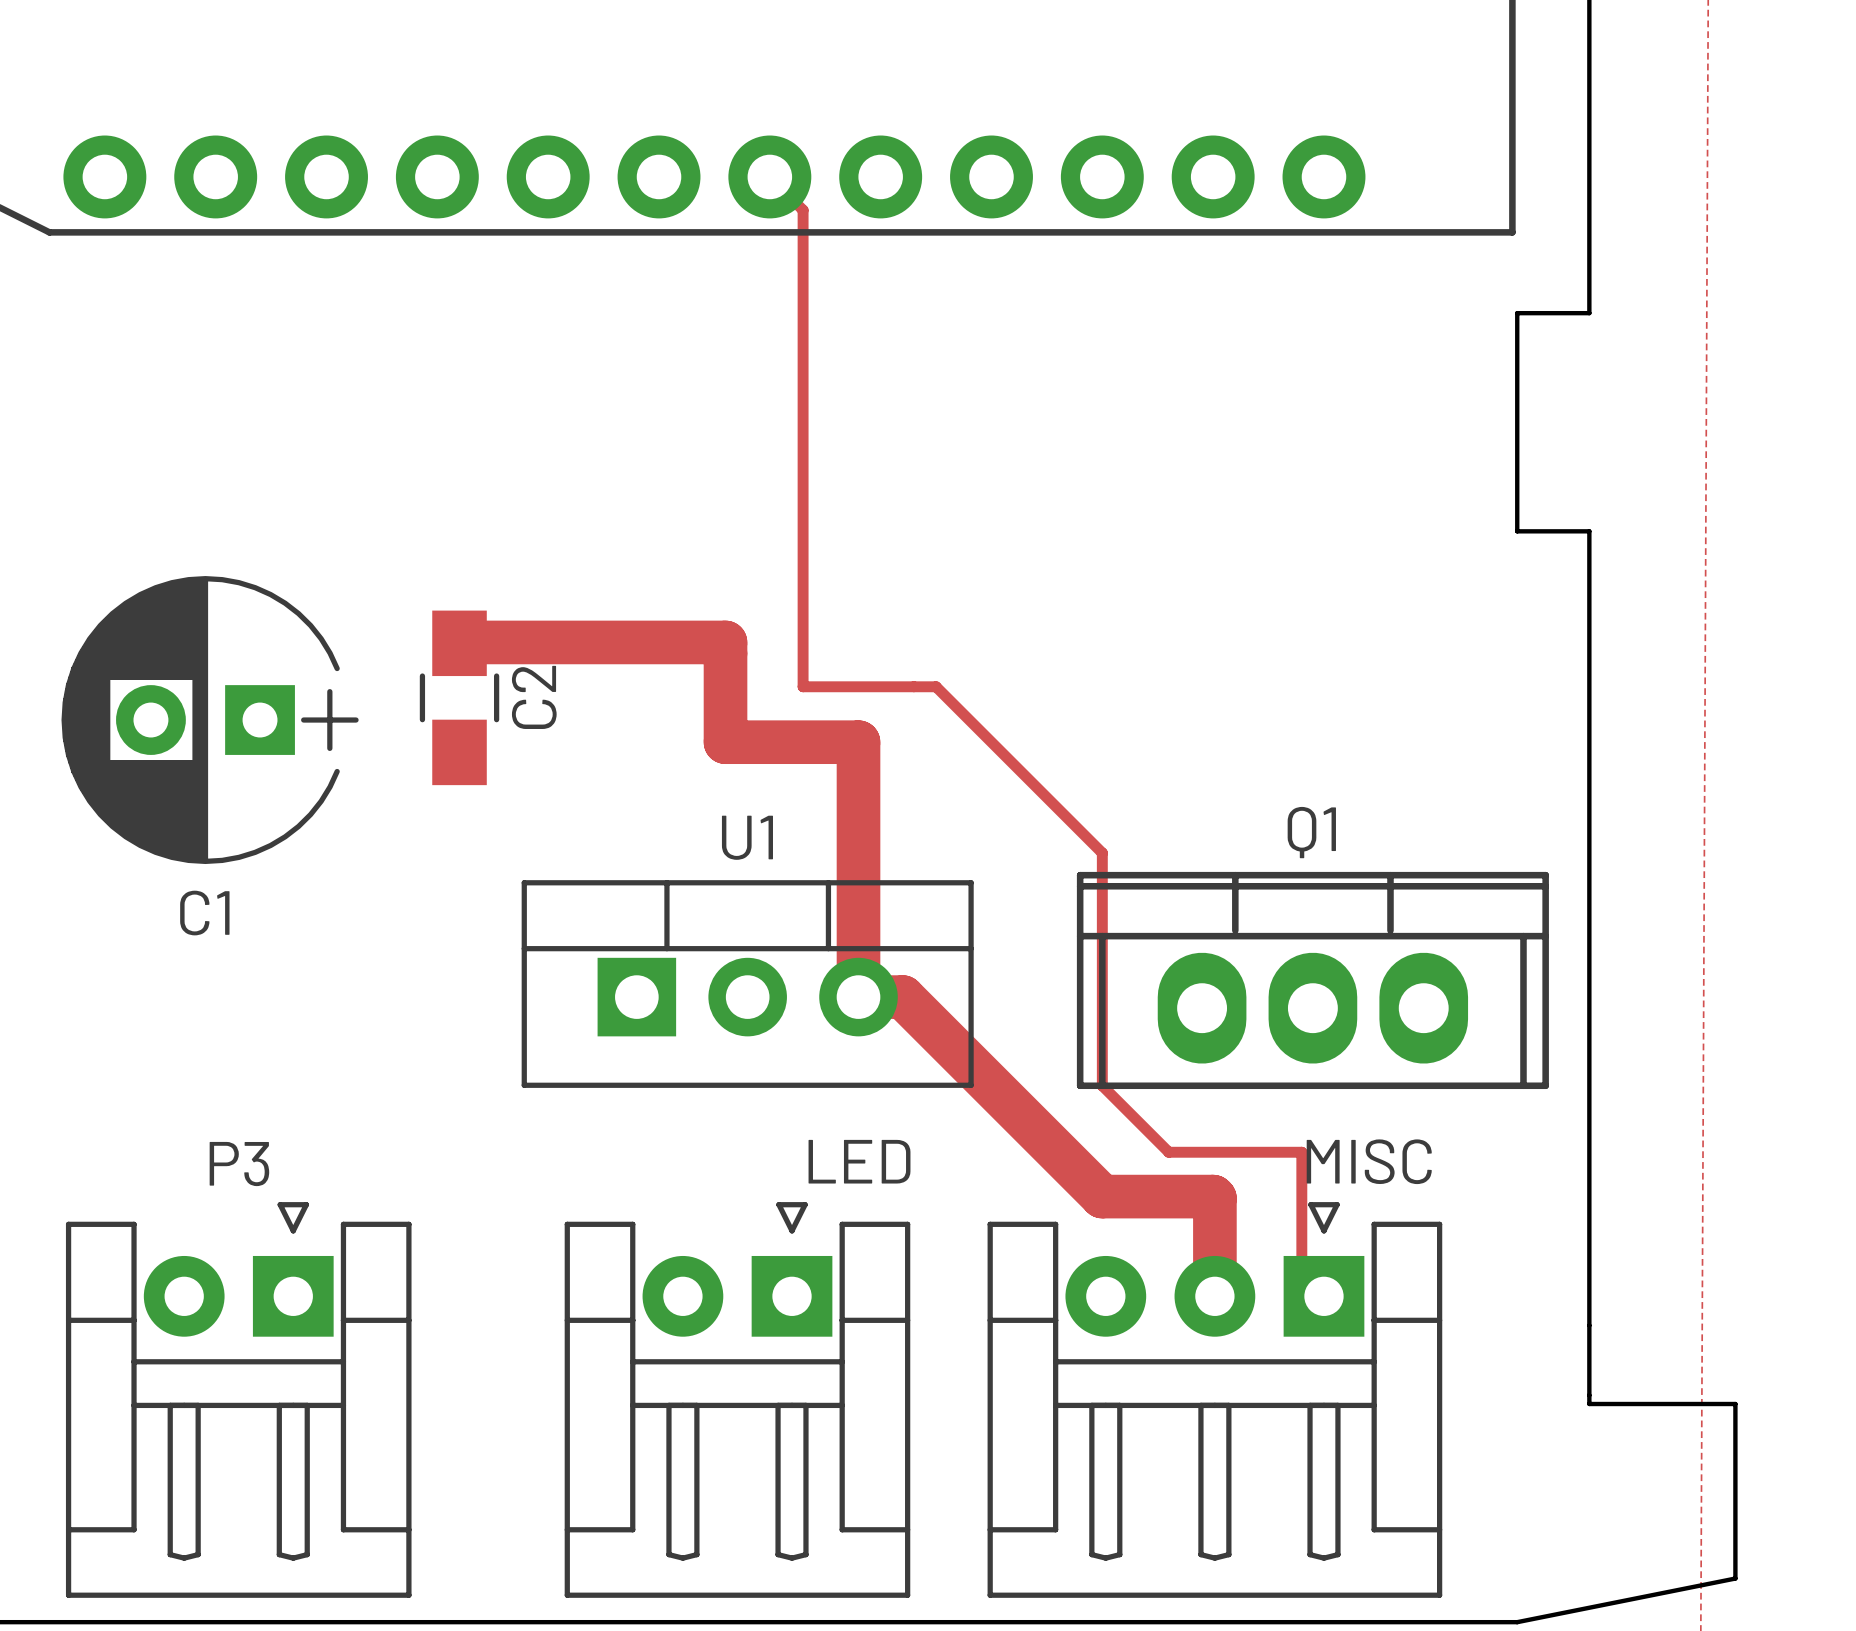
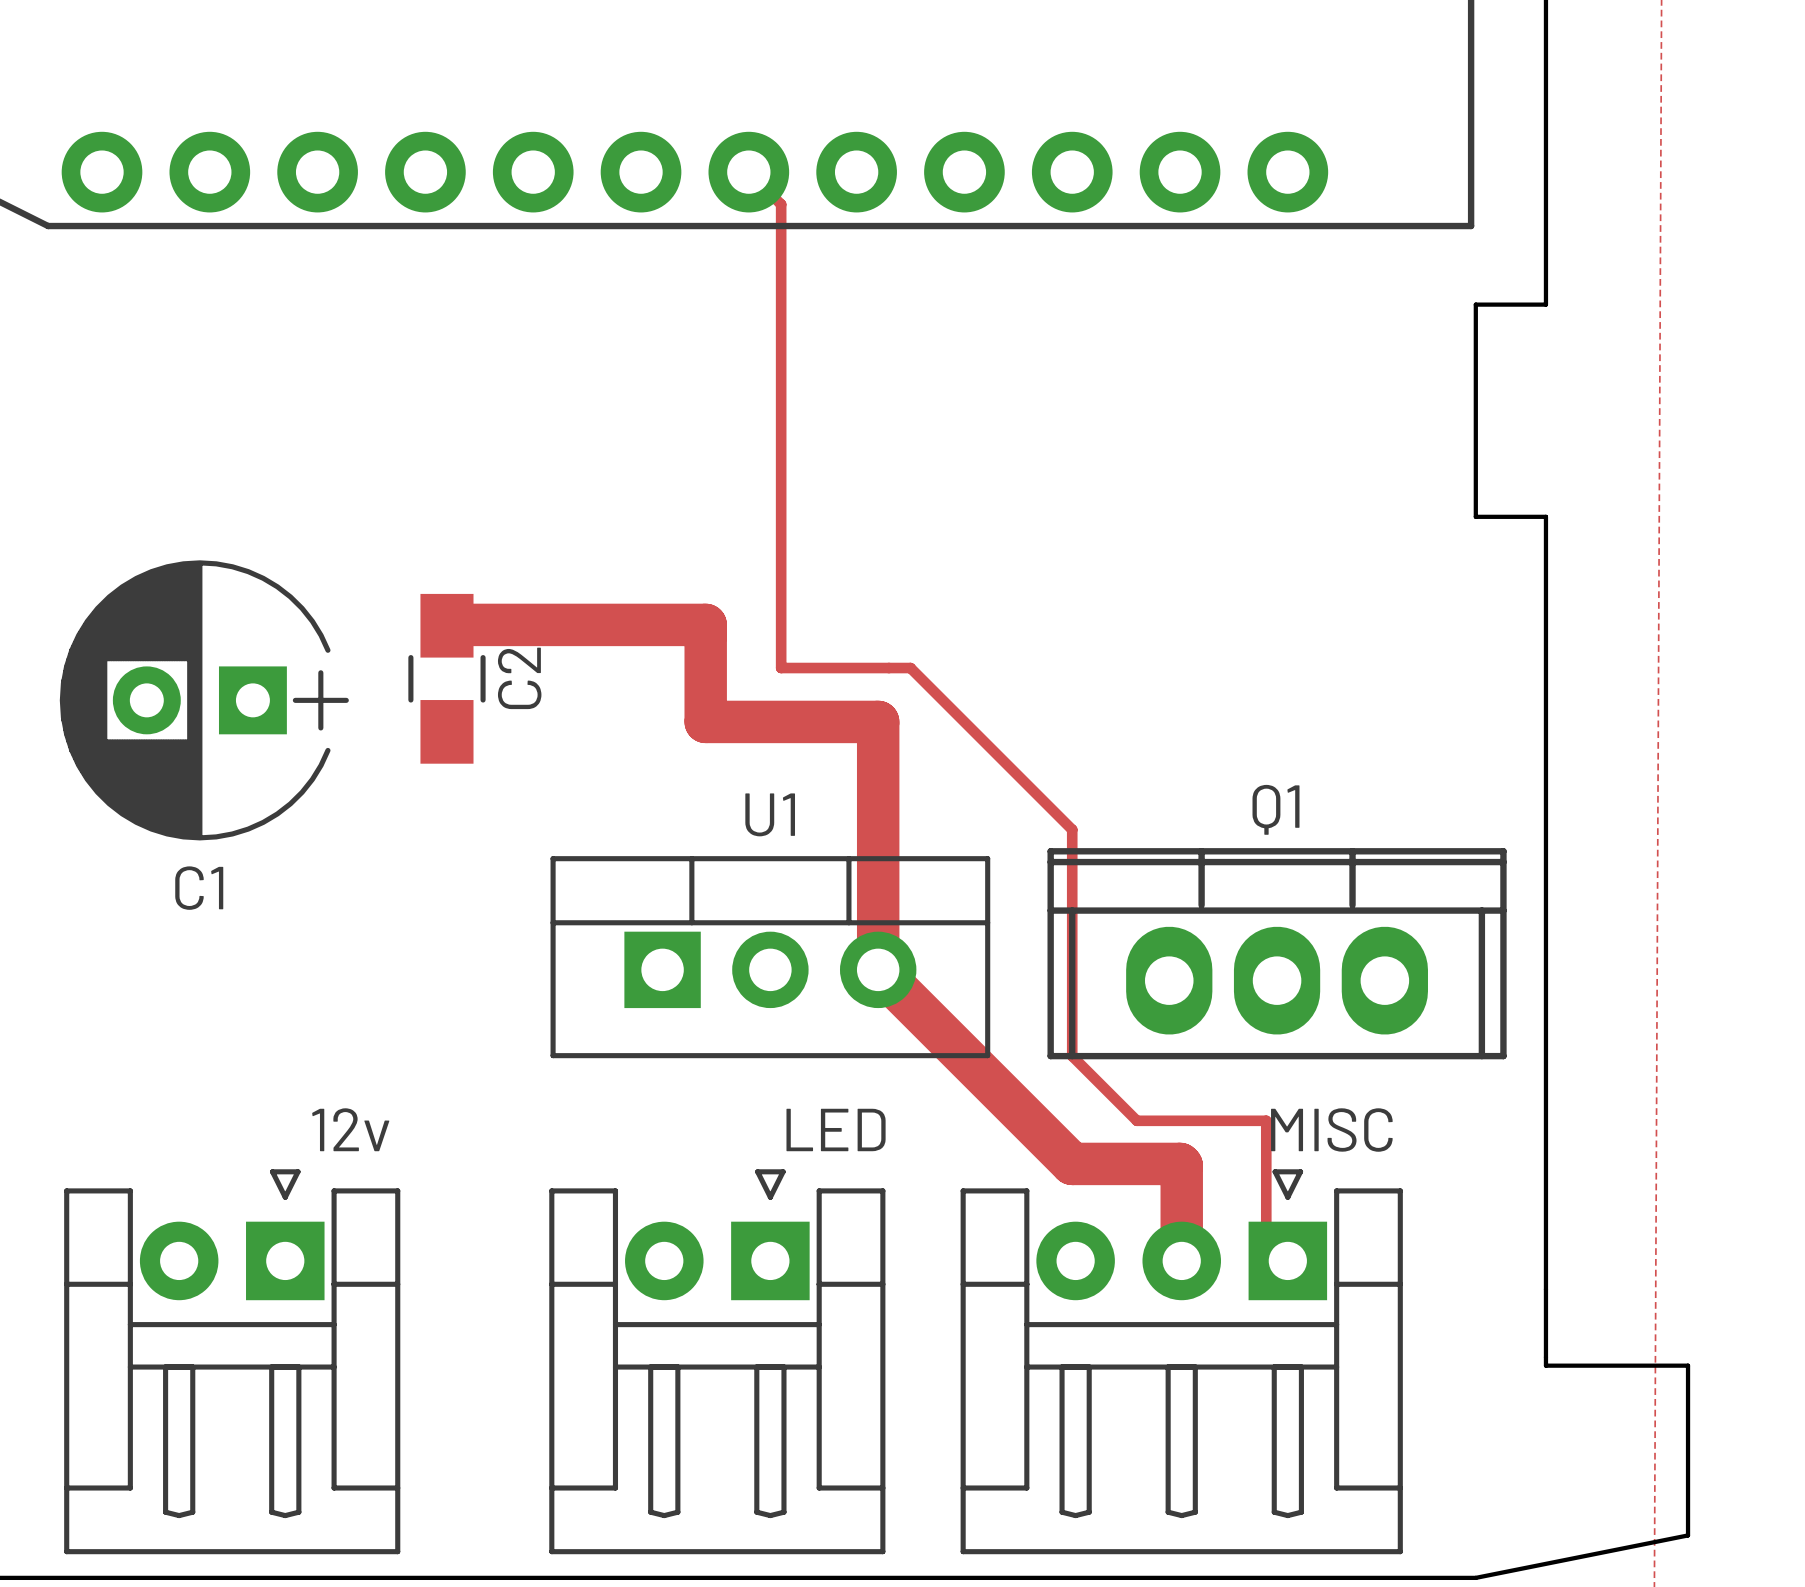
track: (858, 742) (858, 997) (902, 997) -> (835, 721) (878, 721) (878, 969)
U1 position: (747, 984) -> (770, 957)
P3 value: none -> 12v (350, 1129)
P3 name: P3 (239, 1164) -> none

